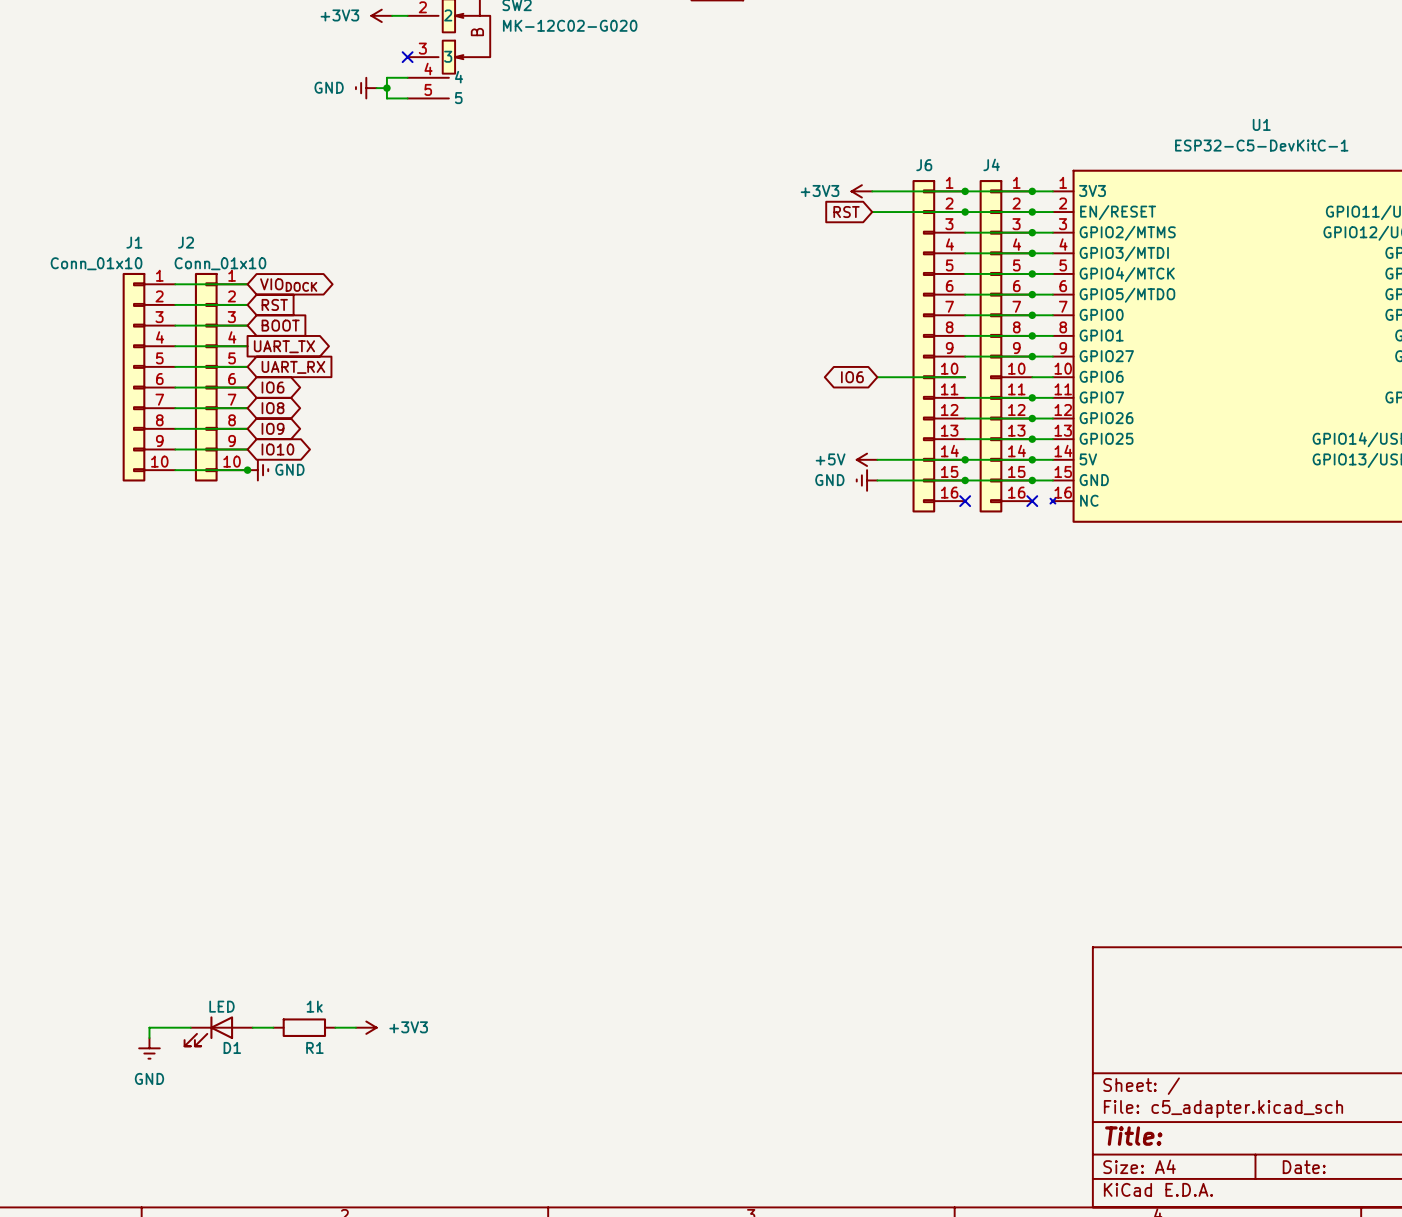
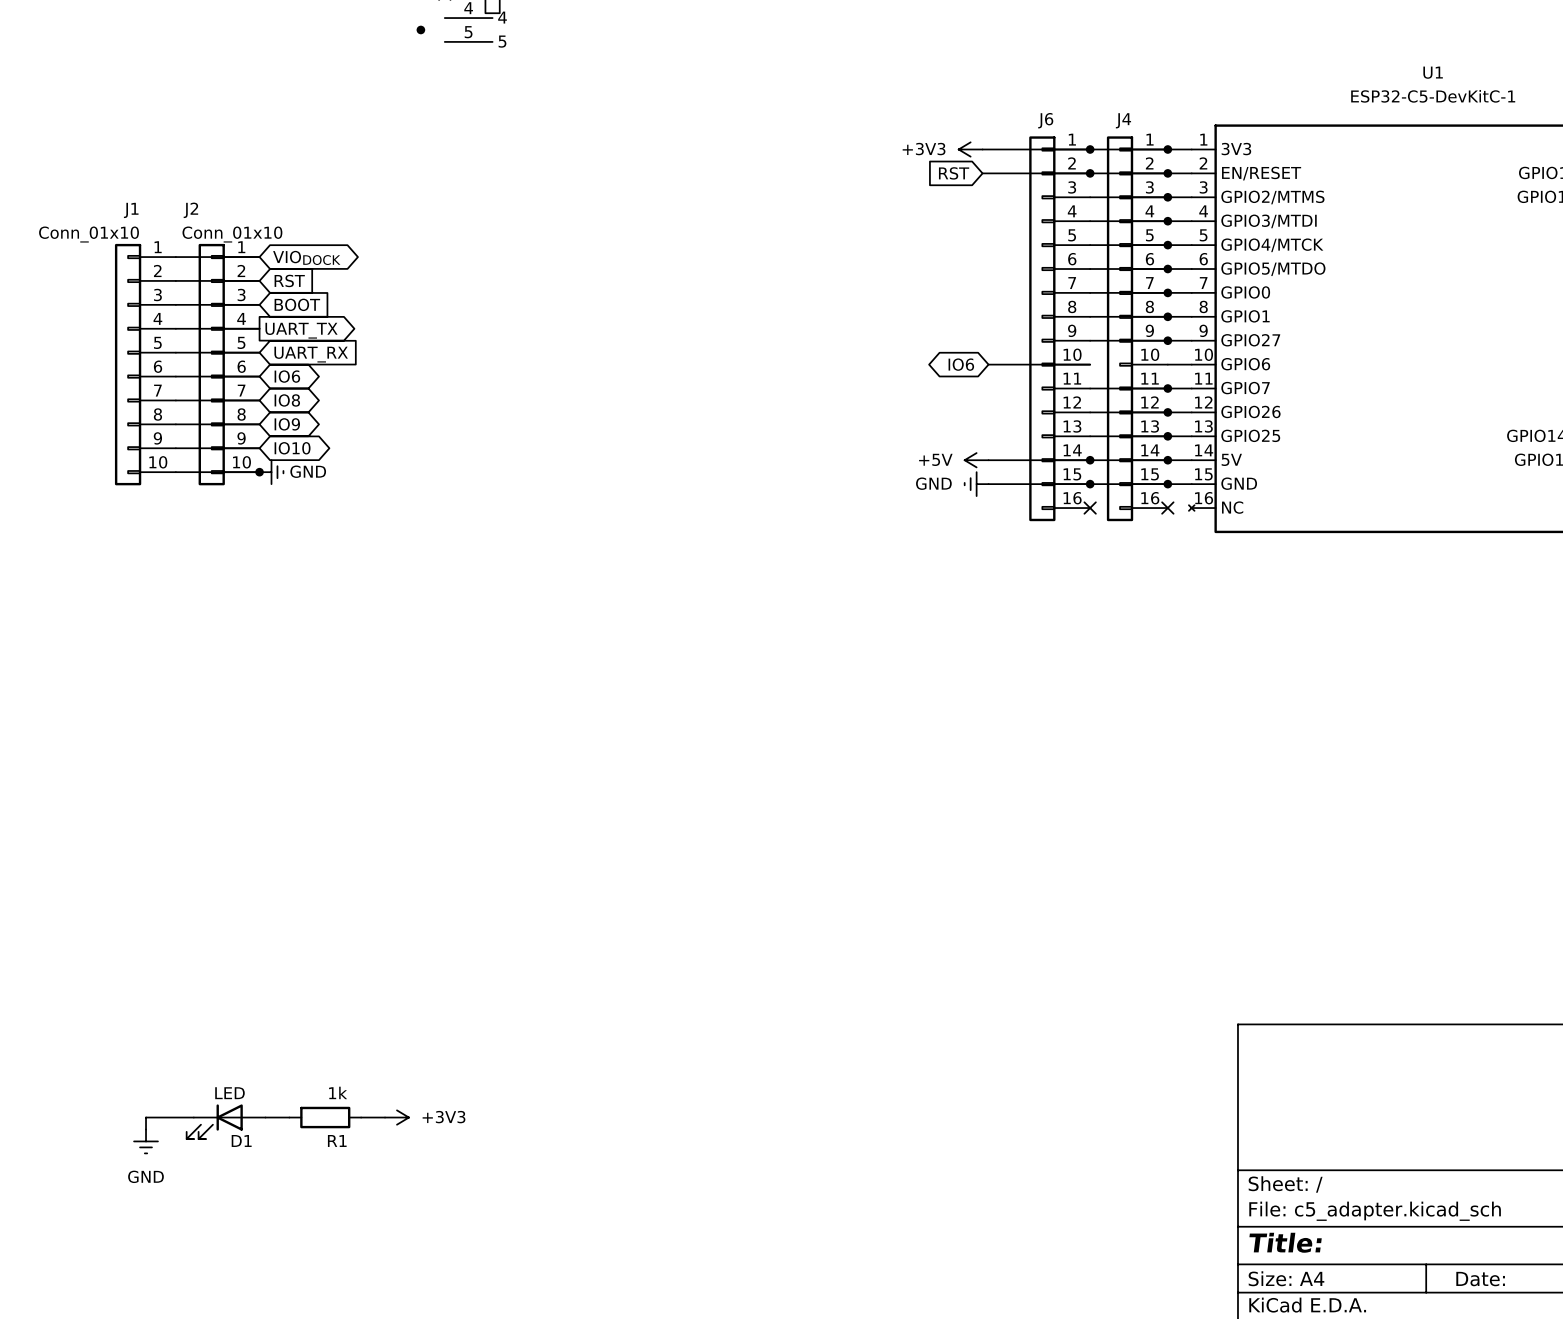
wire: (407, 77) (386, 77) (386, 98) (407, 98) -> none
power symbol: GND (366, 88) -> none
wire: (376, 88) (386, 88) -> none

